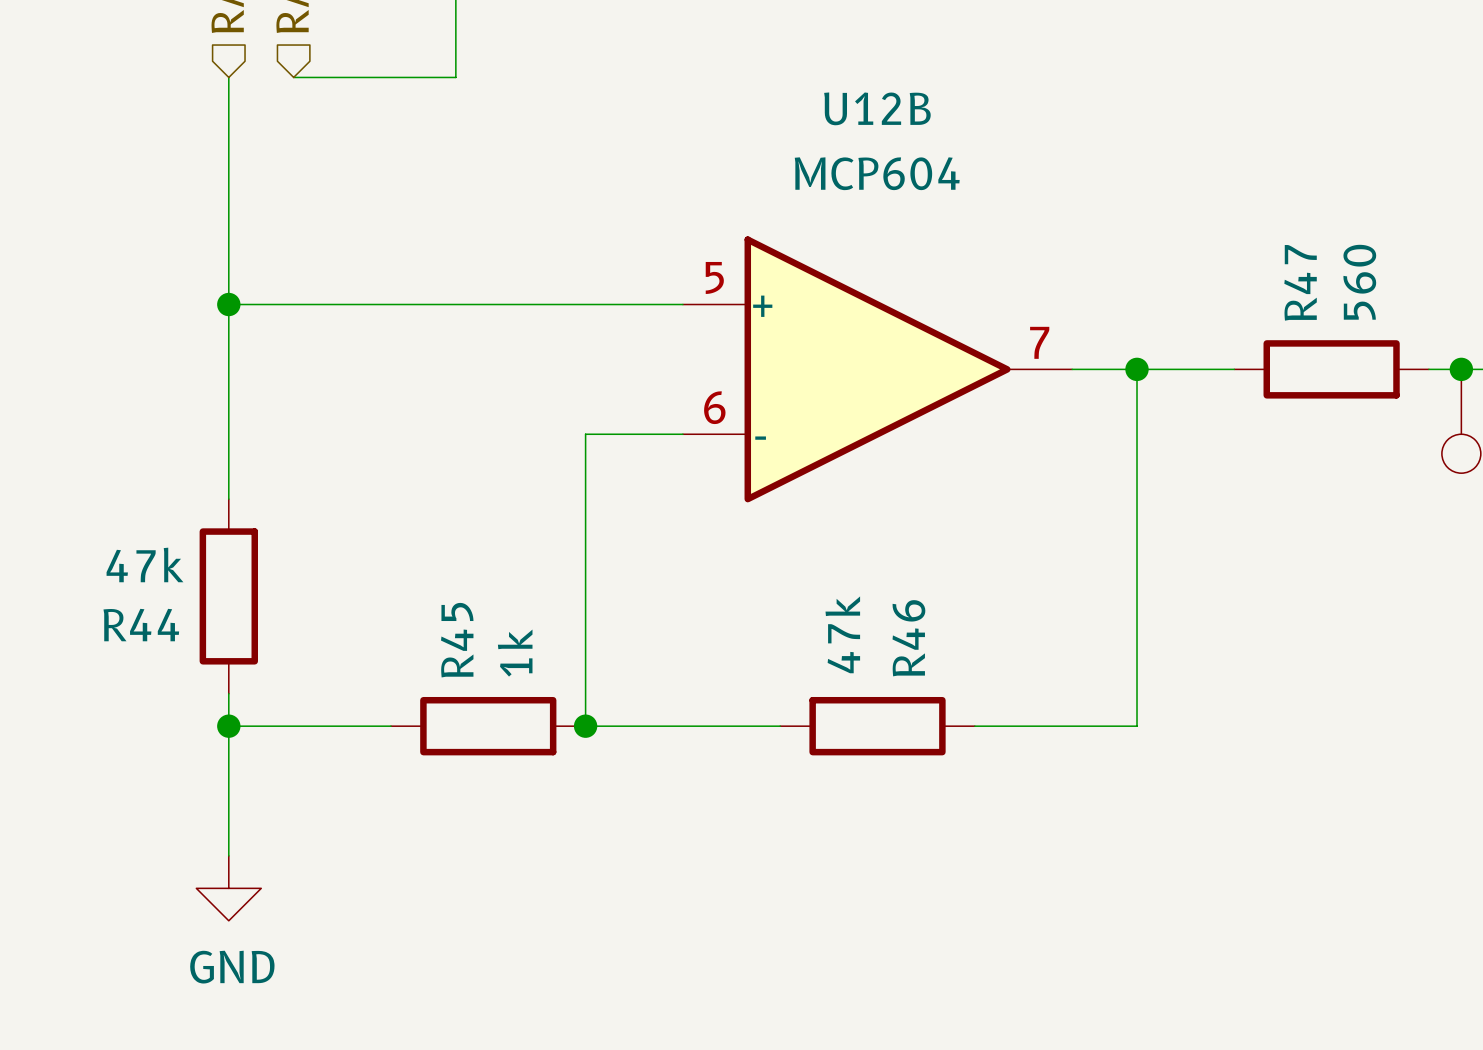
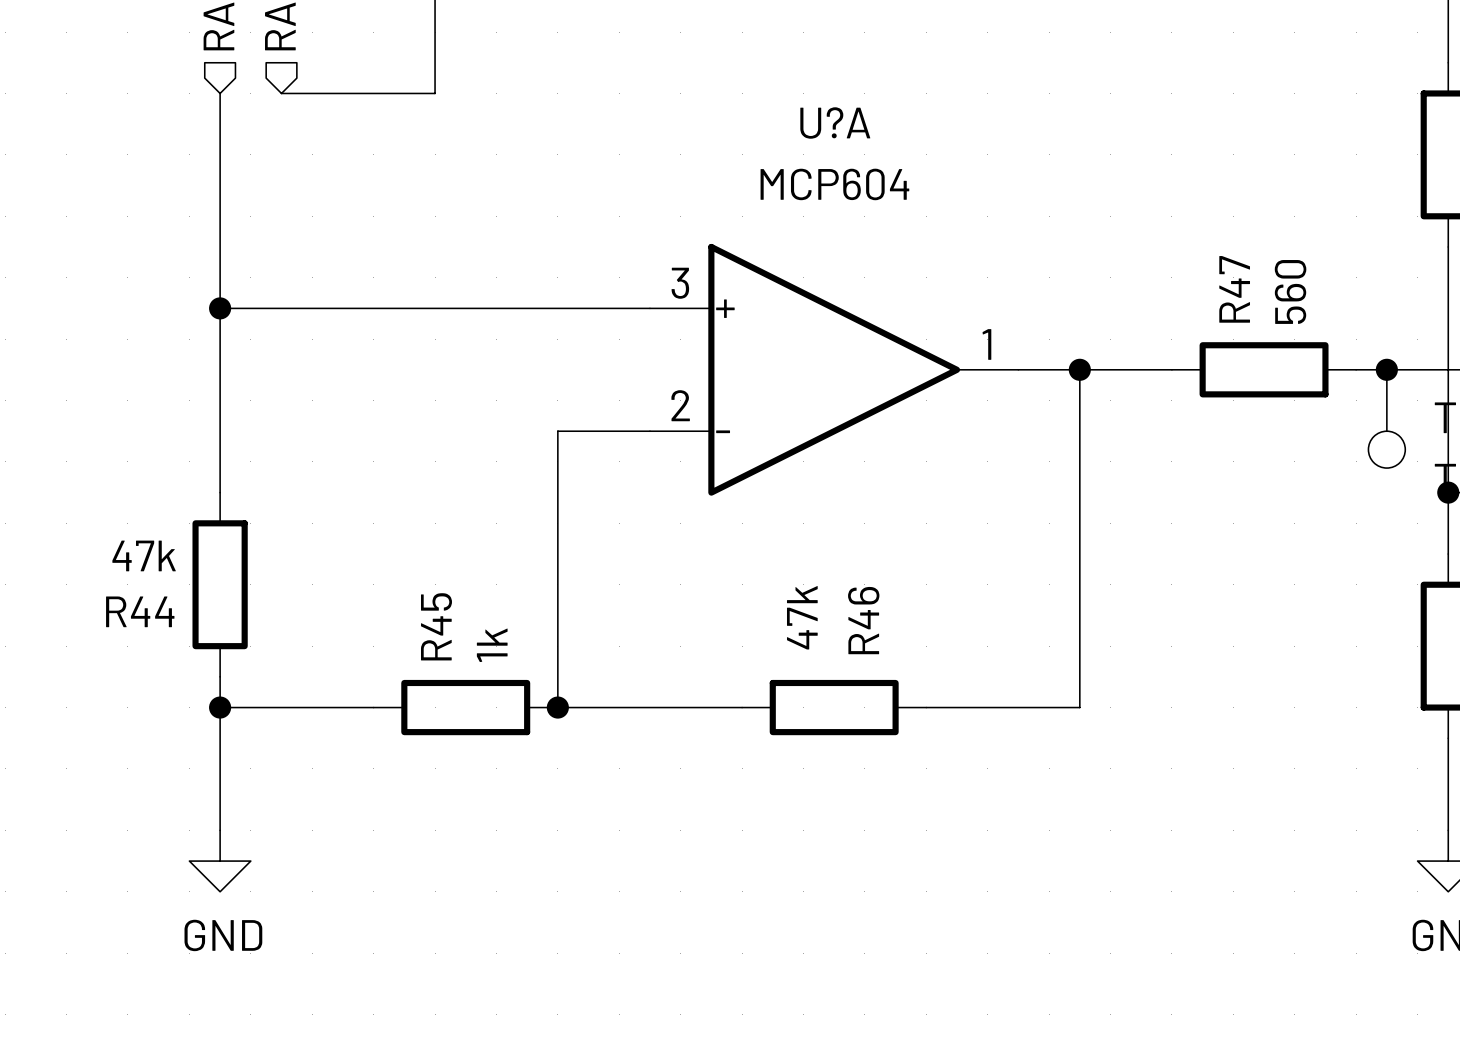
U12B name: U12B (877, 108) -> U?A (835, 123)
U12B pin number: 5 (714, 277) -> 3 (680, 283)
U12B pin number: 7 (1039, 342) -> 1 (986, 344)
U12B pin number: 6 (714, 407) -> 2 (680, 405)

